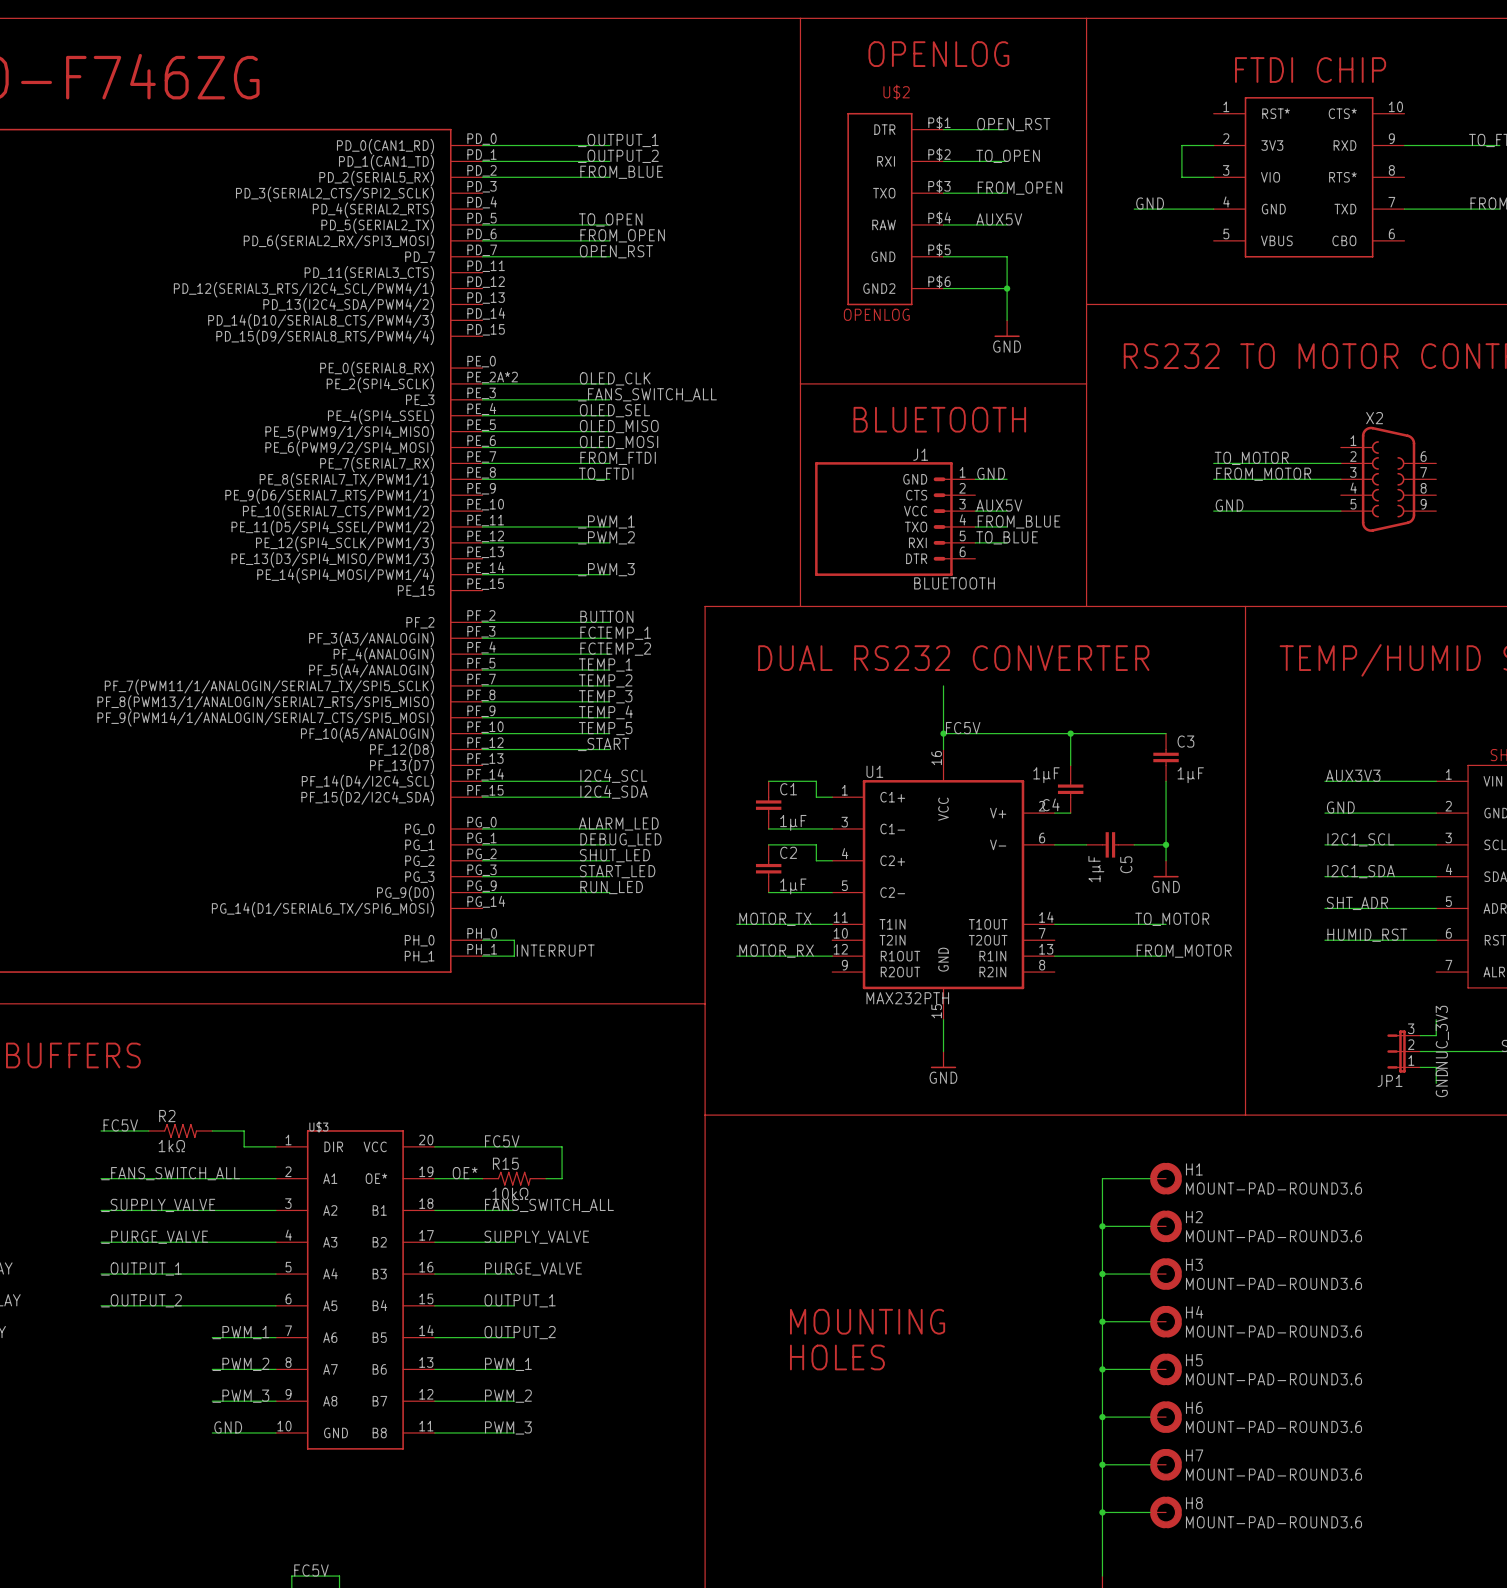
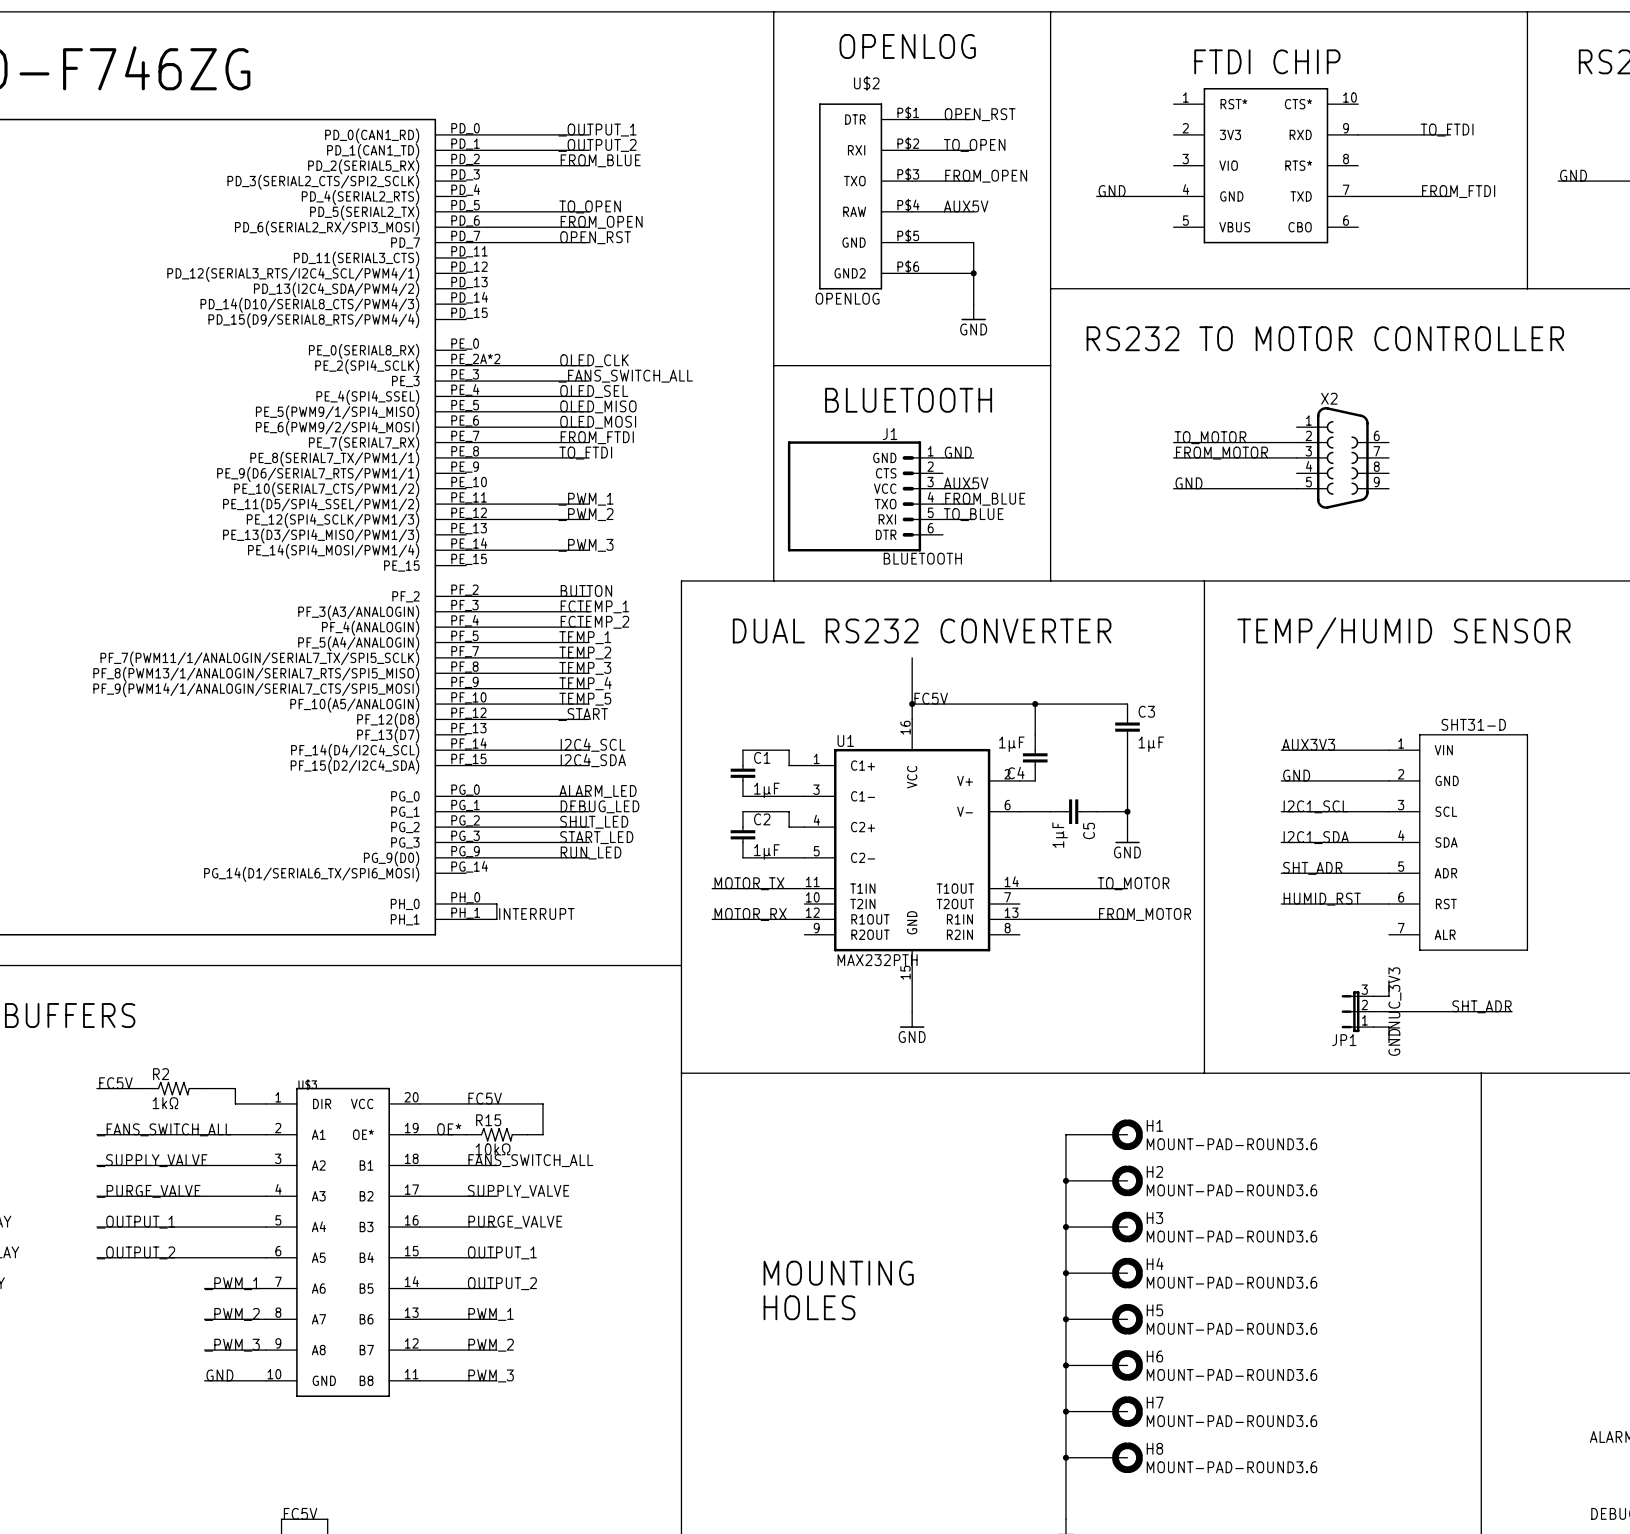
wire: (1213, 145) (1181, 145) (1181, 177) (1213, 177) -> none

